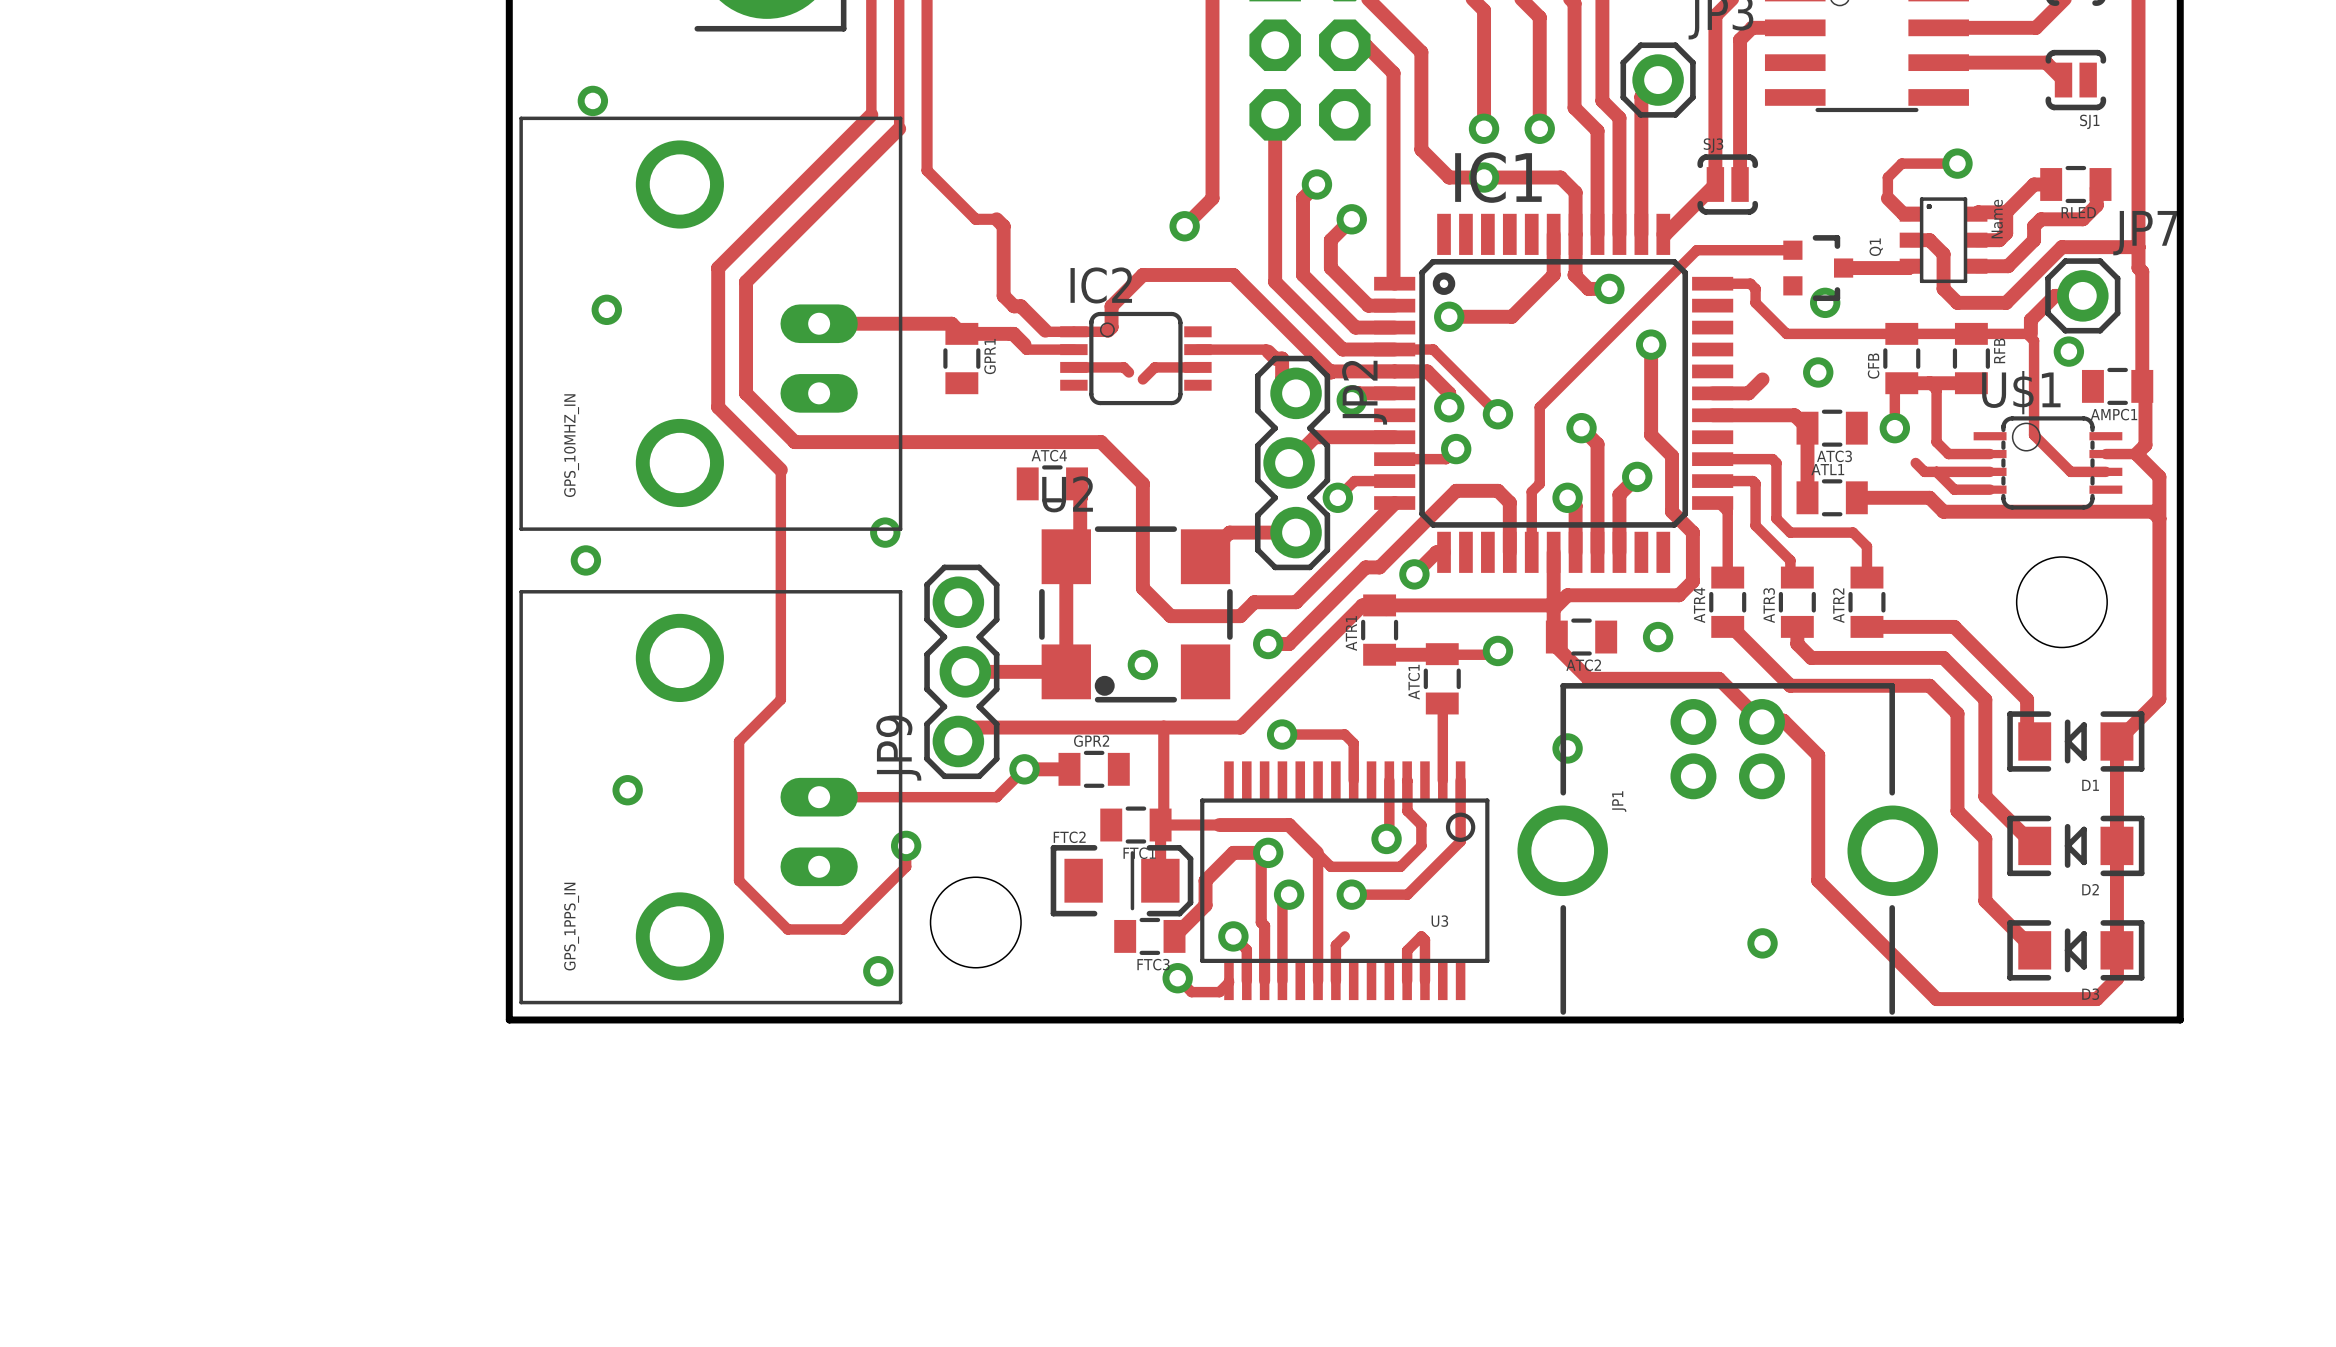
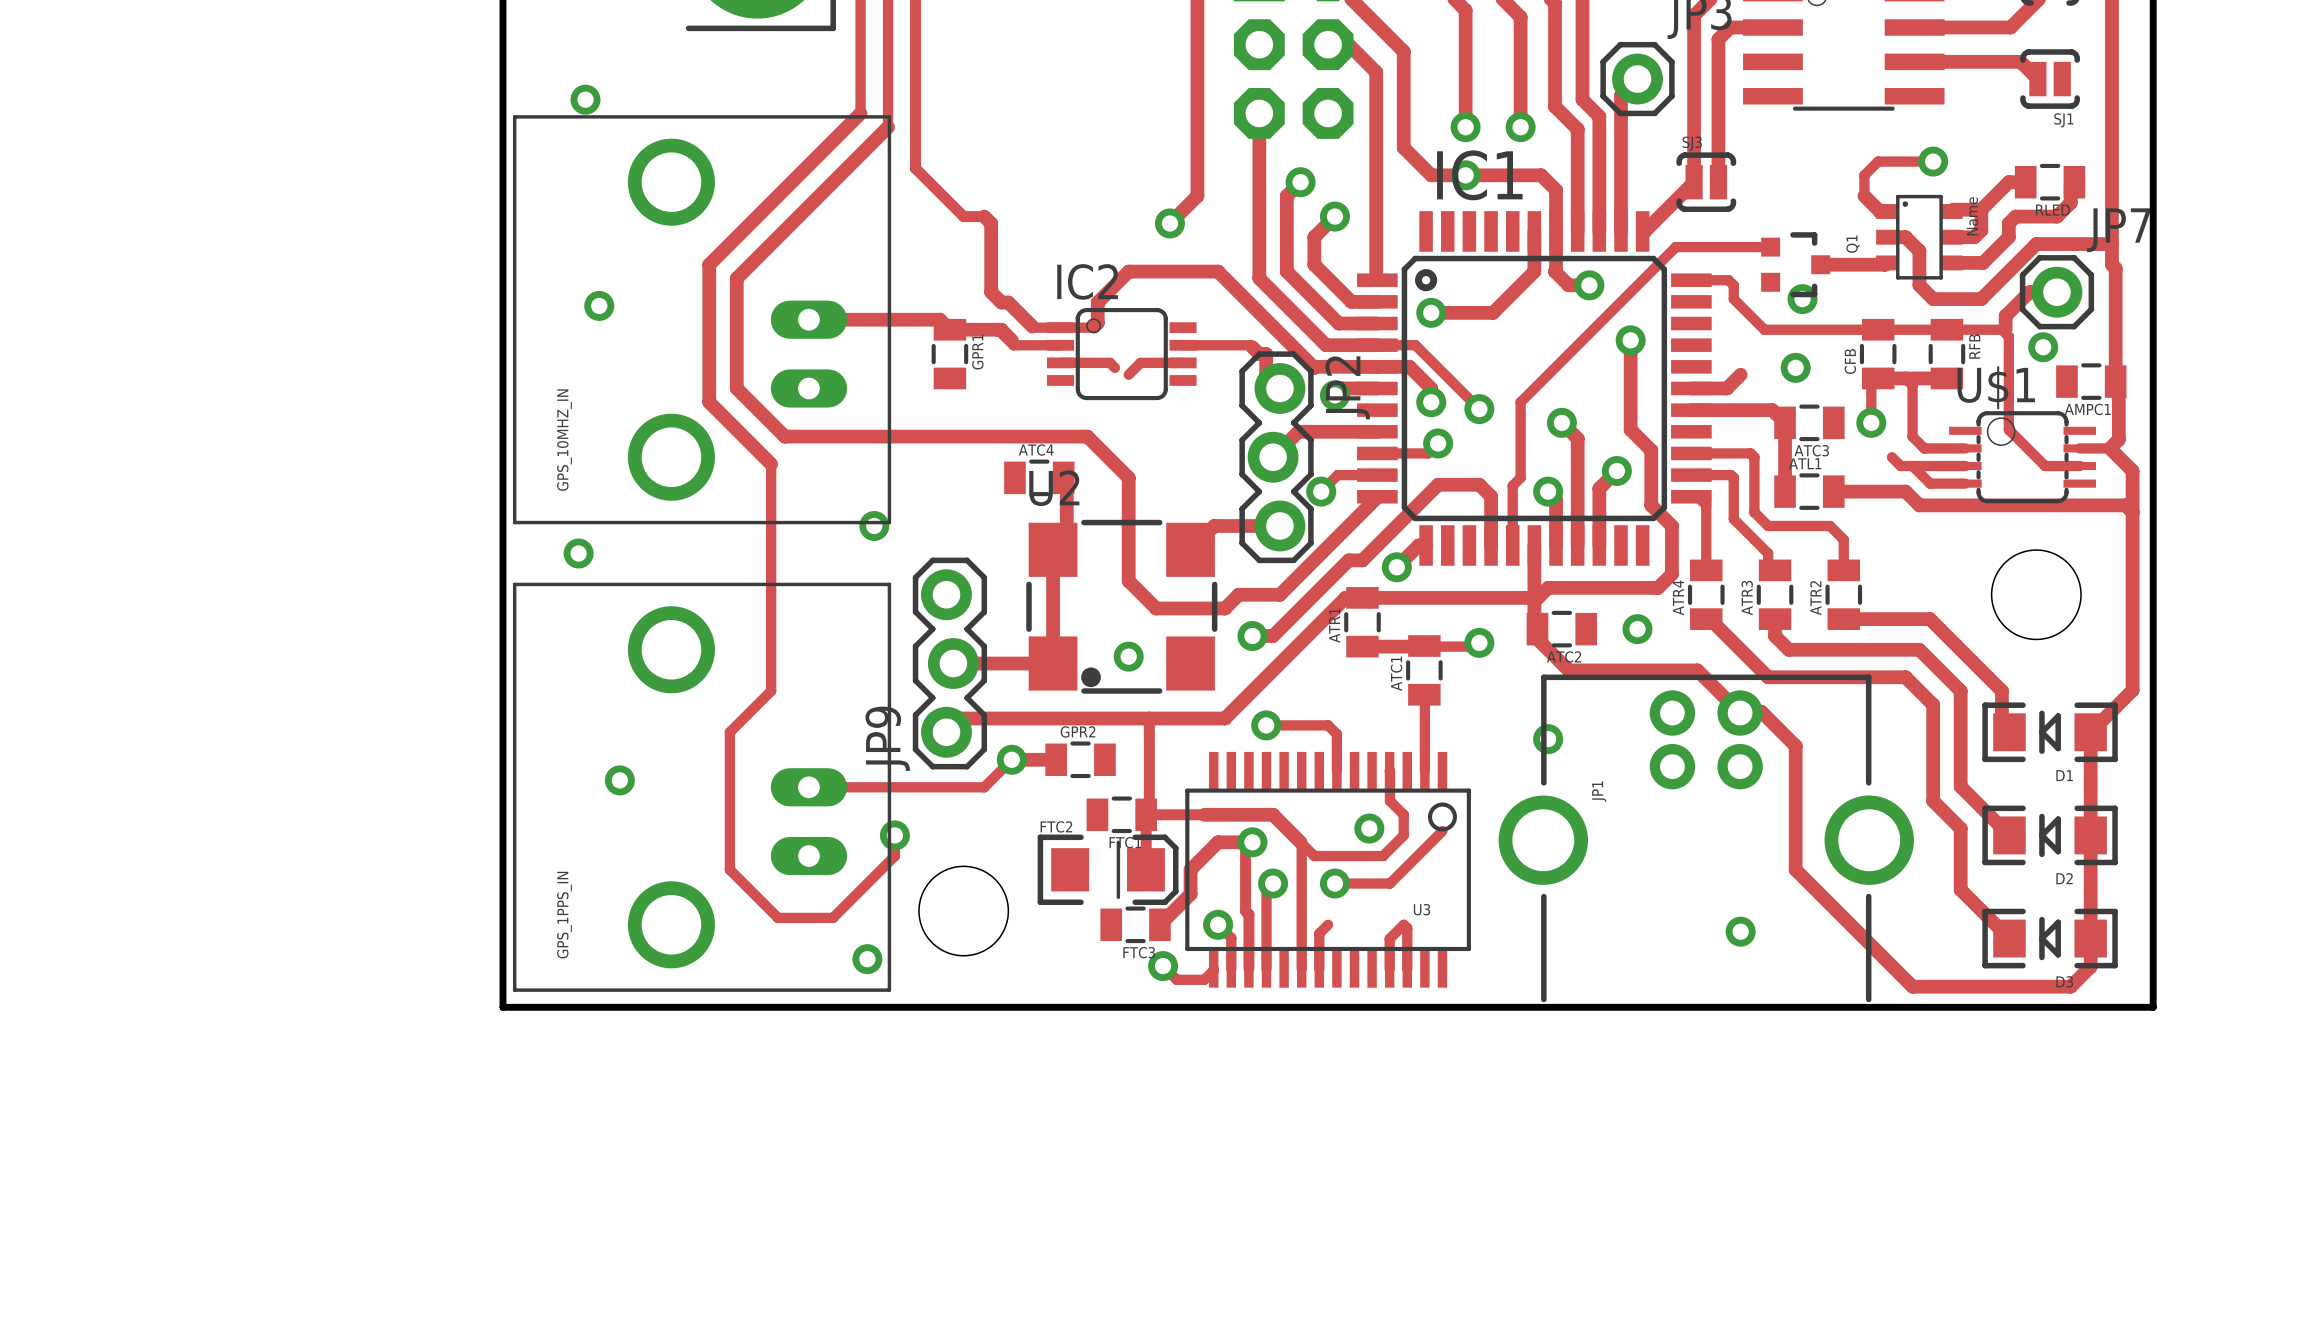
track: (1389, 780) (1389, 836) -> none
track: (1460, 780) (1460, 841) -> none

